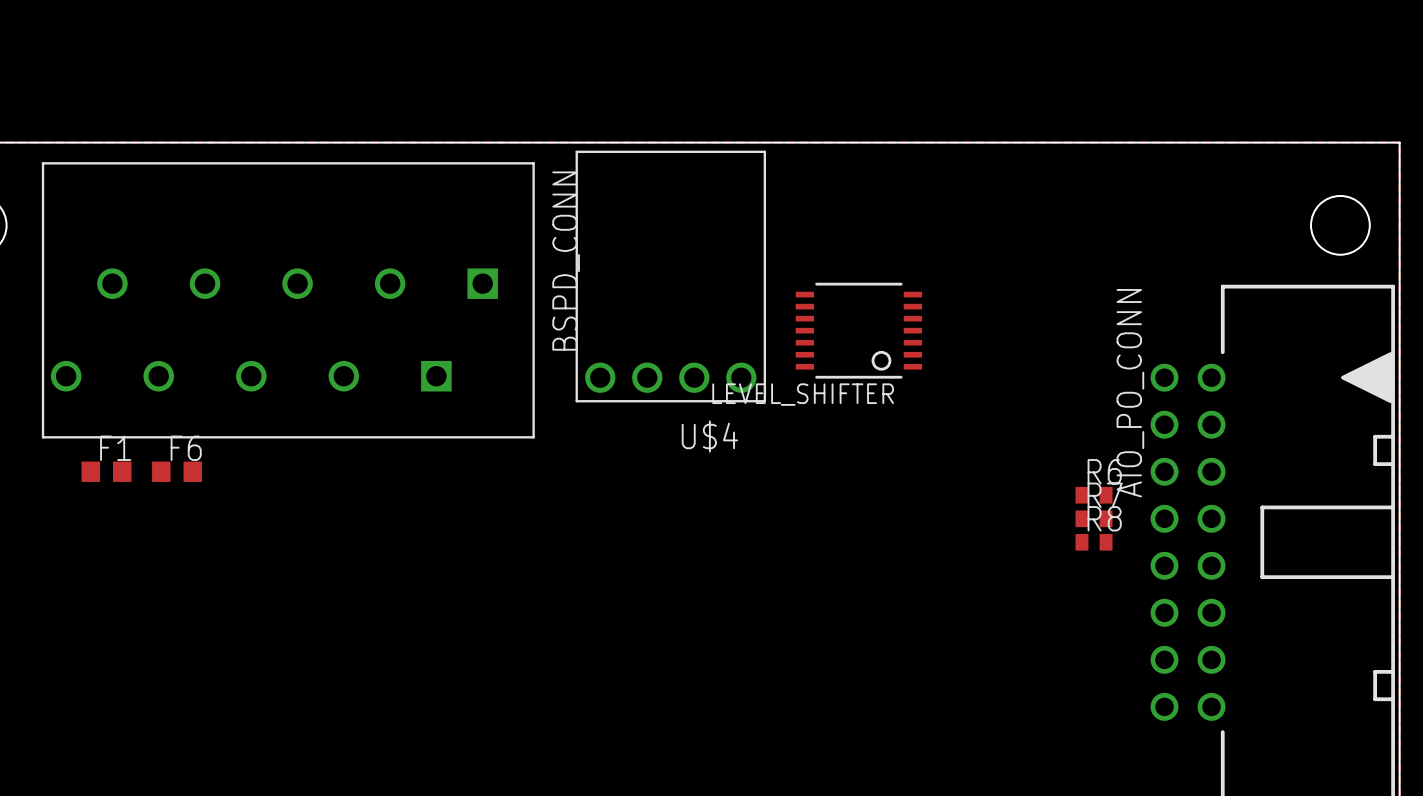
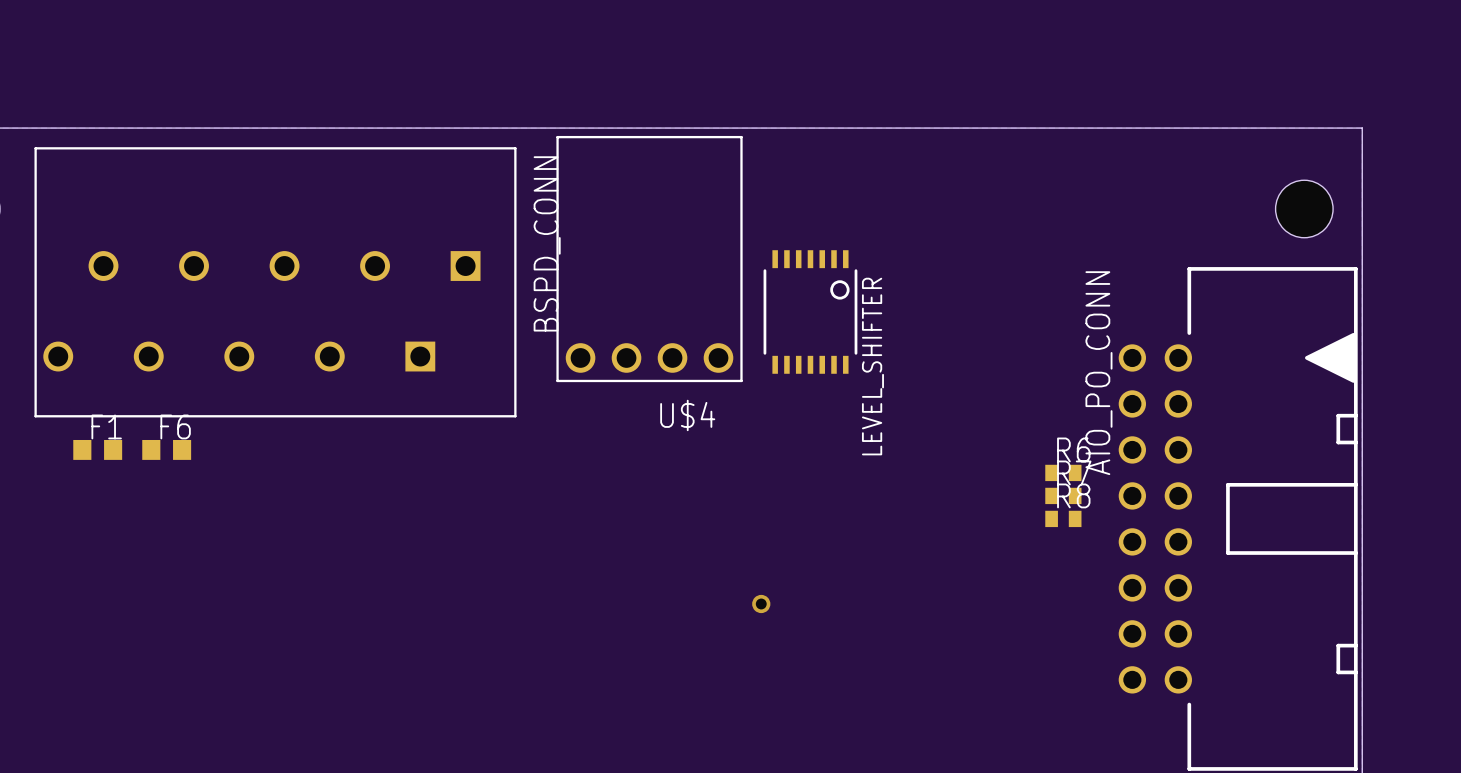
LEVEL_SHIFTER rotation: 0° (858, 330) -> 90° counterclockwise (810, 311)
via: none -> (761, 603)

